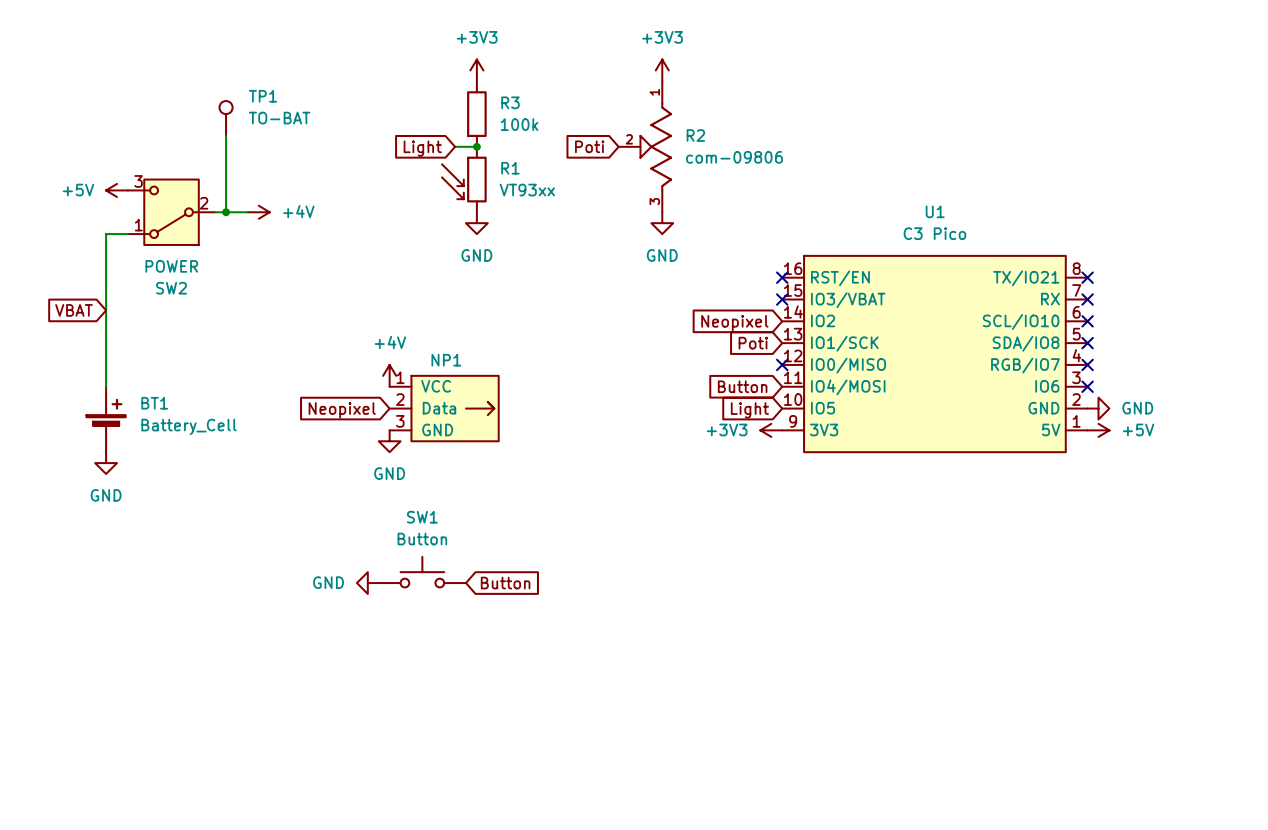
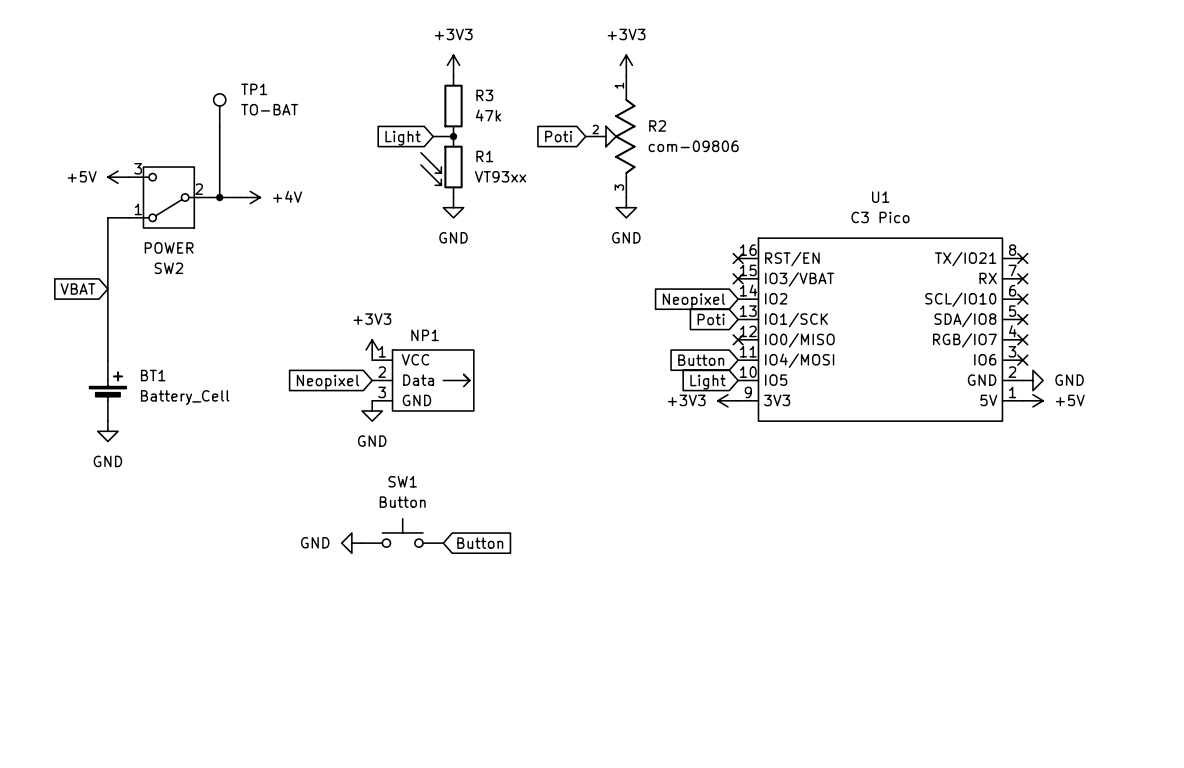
R3 value: 100k (519, 124) -> 47k (488, 115)
power symbol: +4V (389, 375) -> +3V3 (372, 349)

